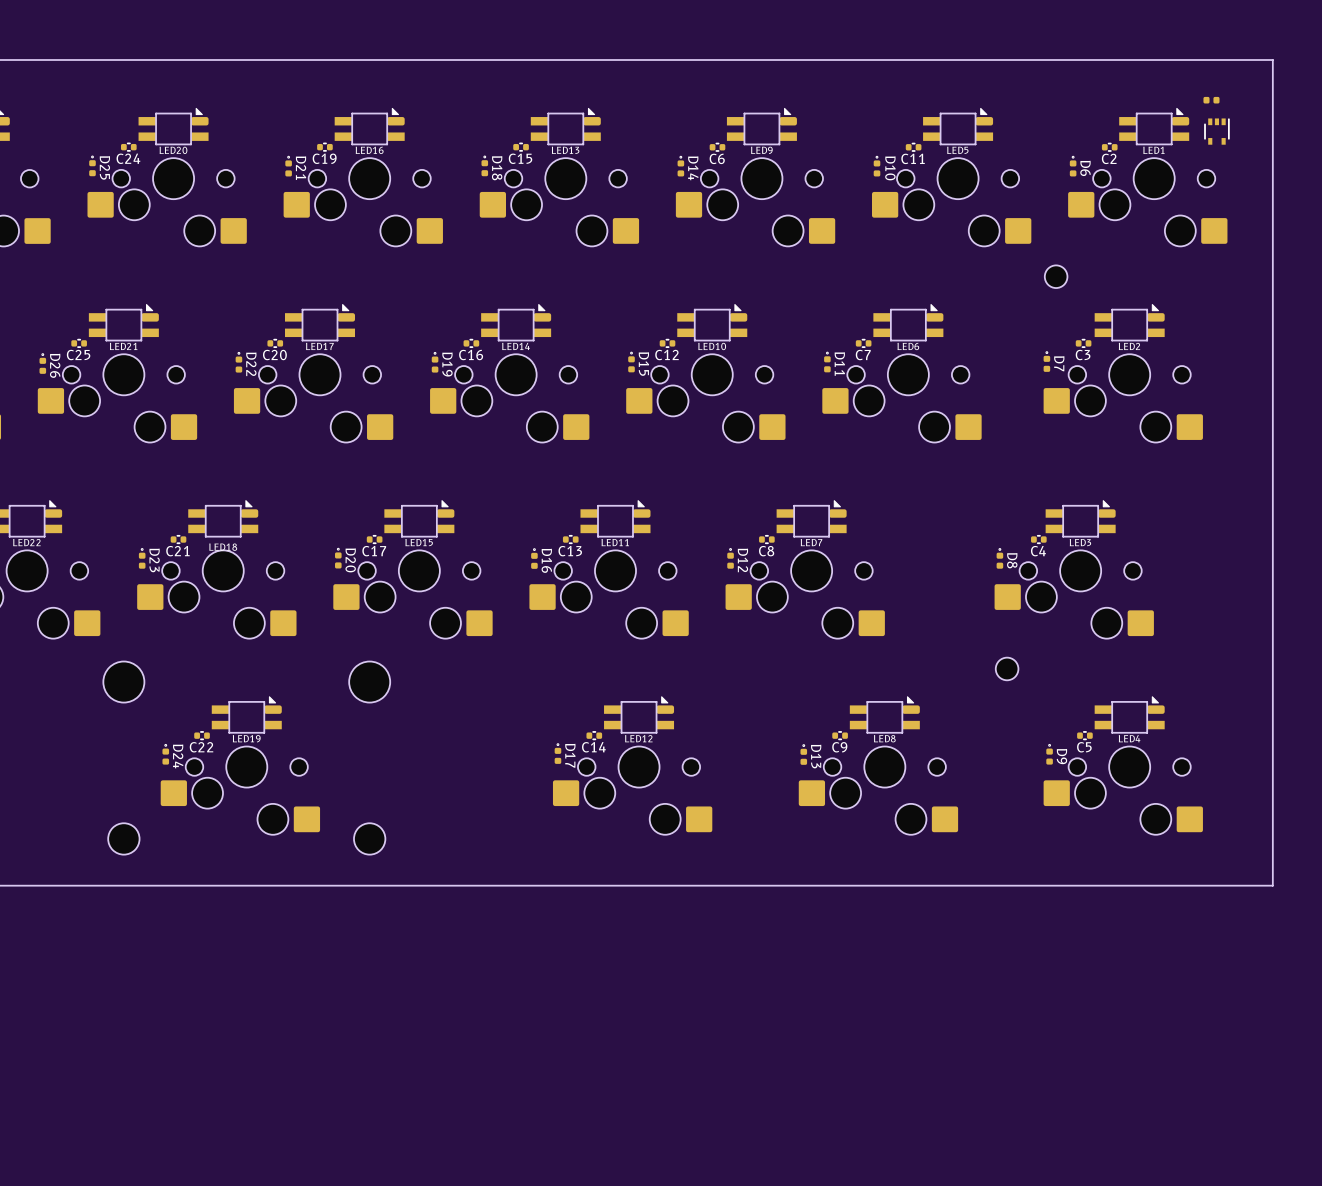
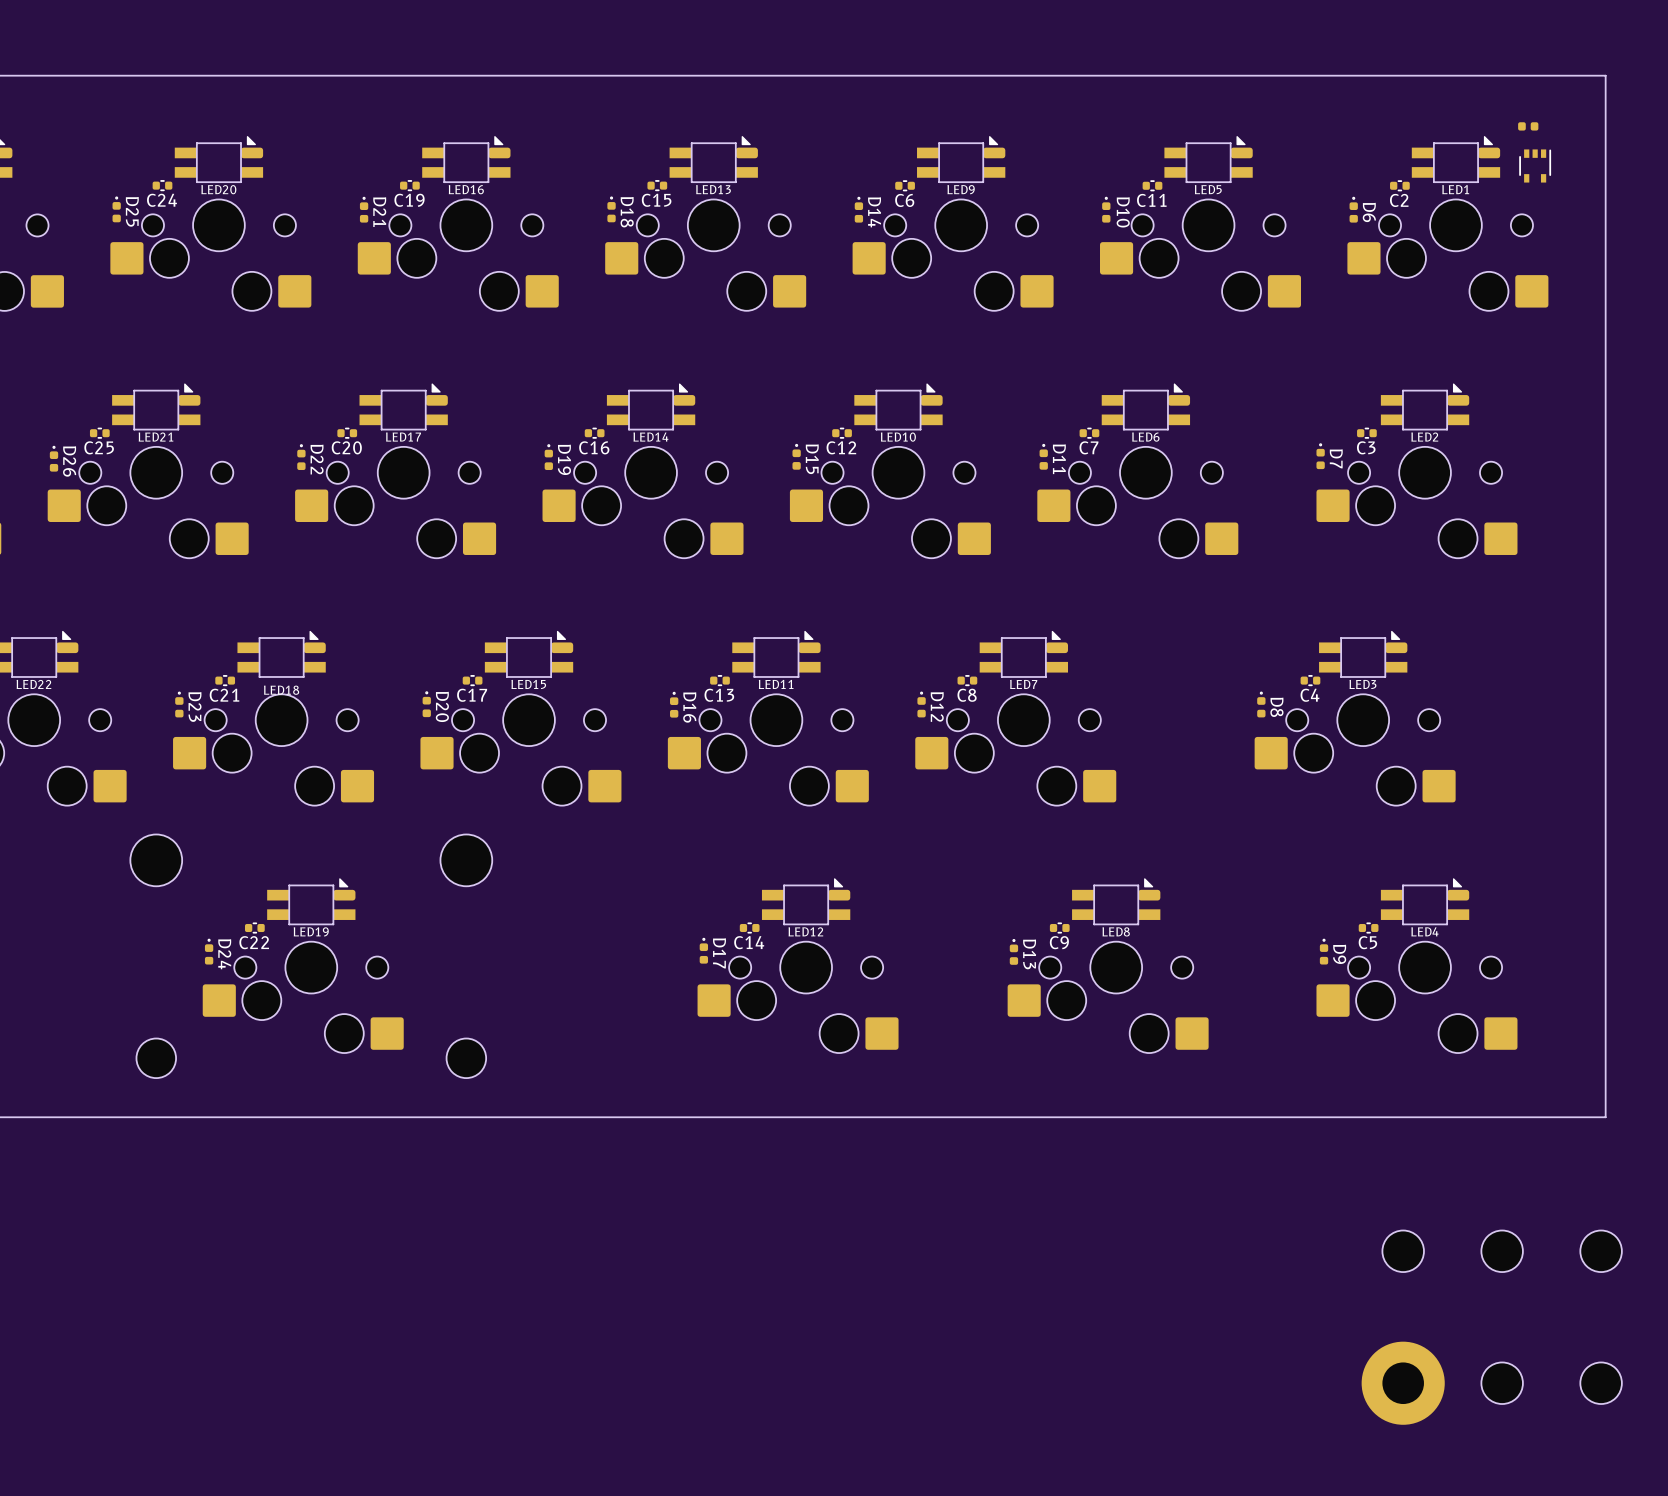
part: (1056, 276) -> none
part: (1007, 668) -> none
part: none -> (1403, 1251)
part: none -> (1502, 1251)
part: none -> (1601, 1251)
part: none -> (1403, 1383)
part: none -> (1502, 1383)
part: none -> (1601, 1383)

